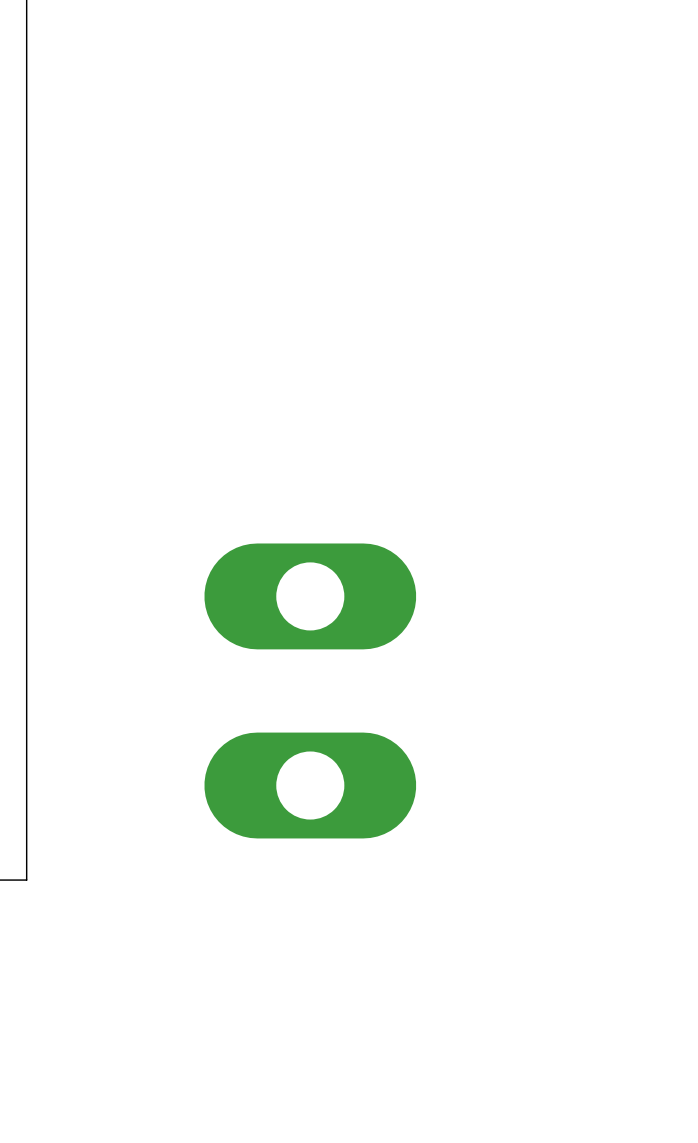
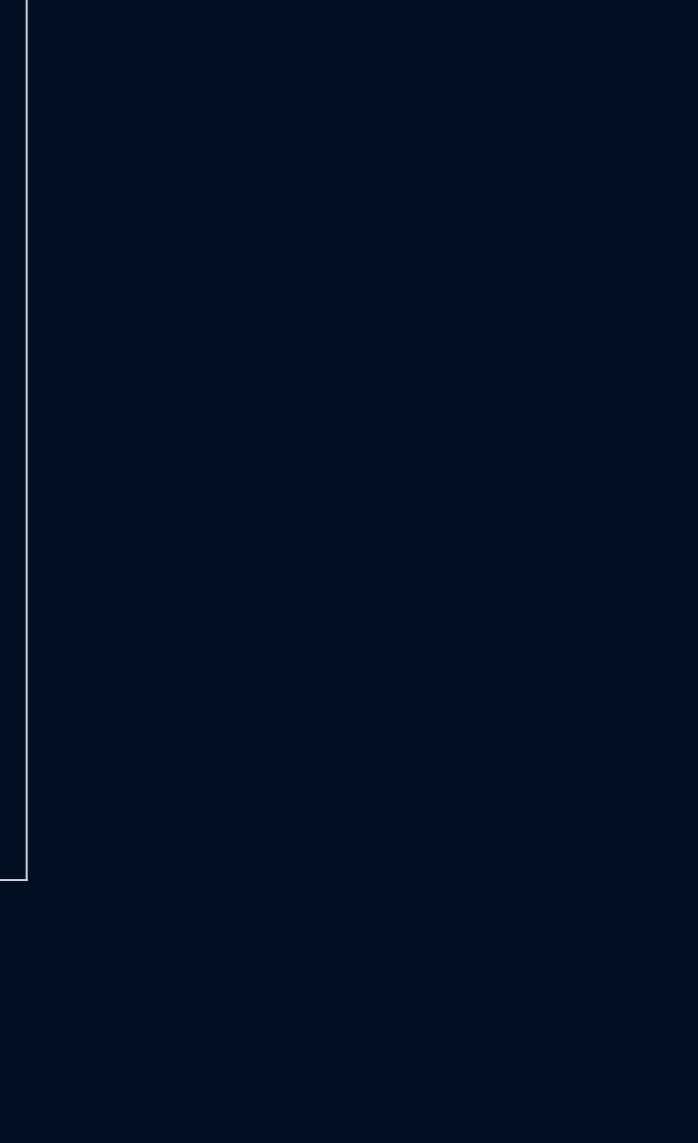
part: (310, 690) -> none

